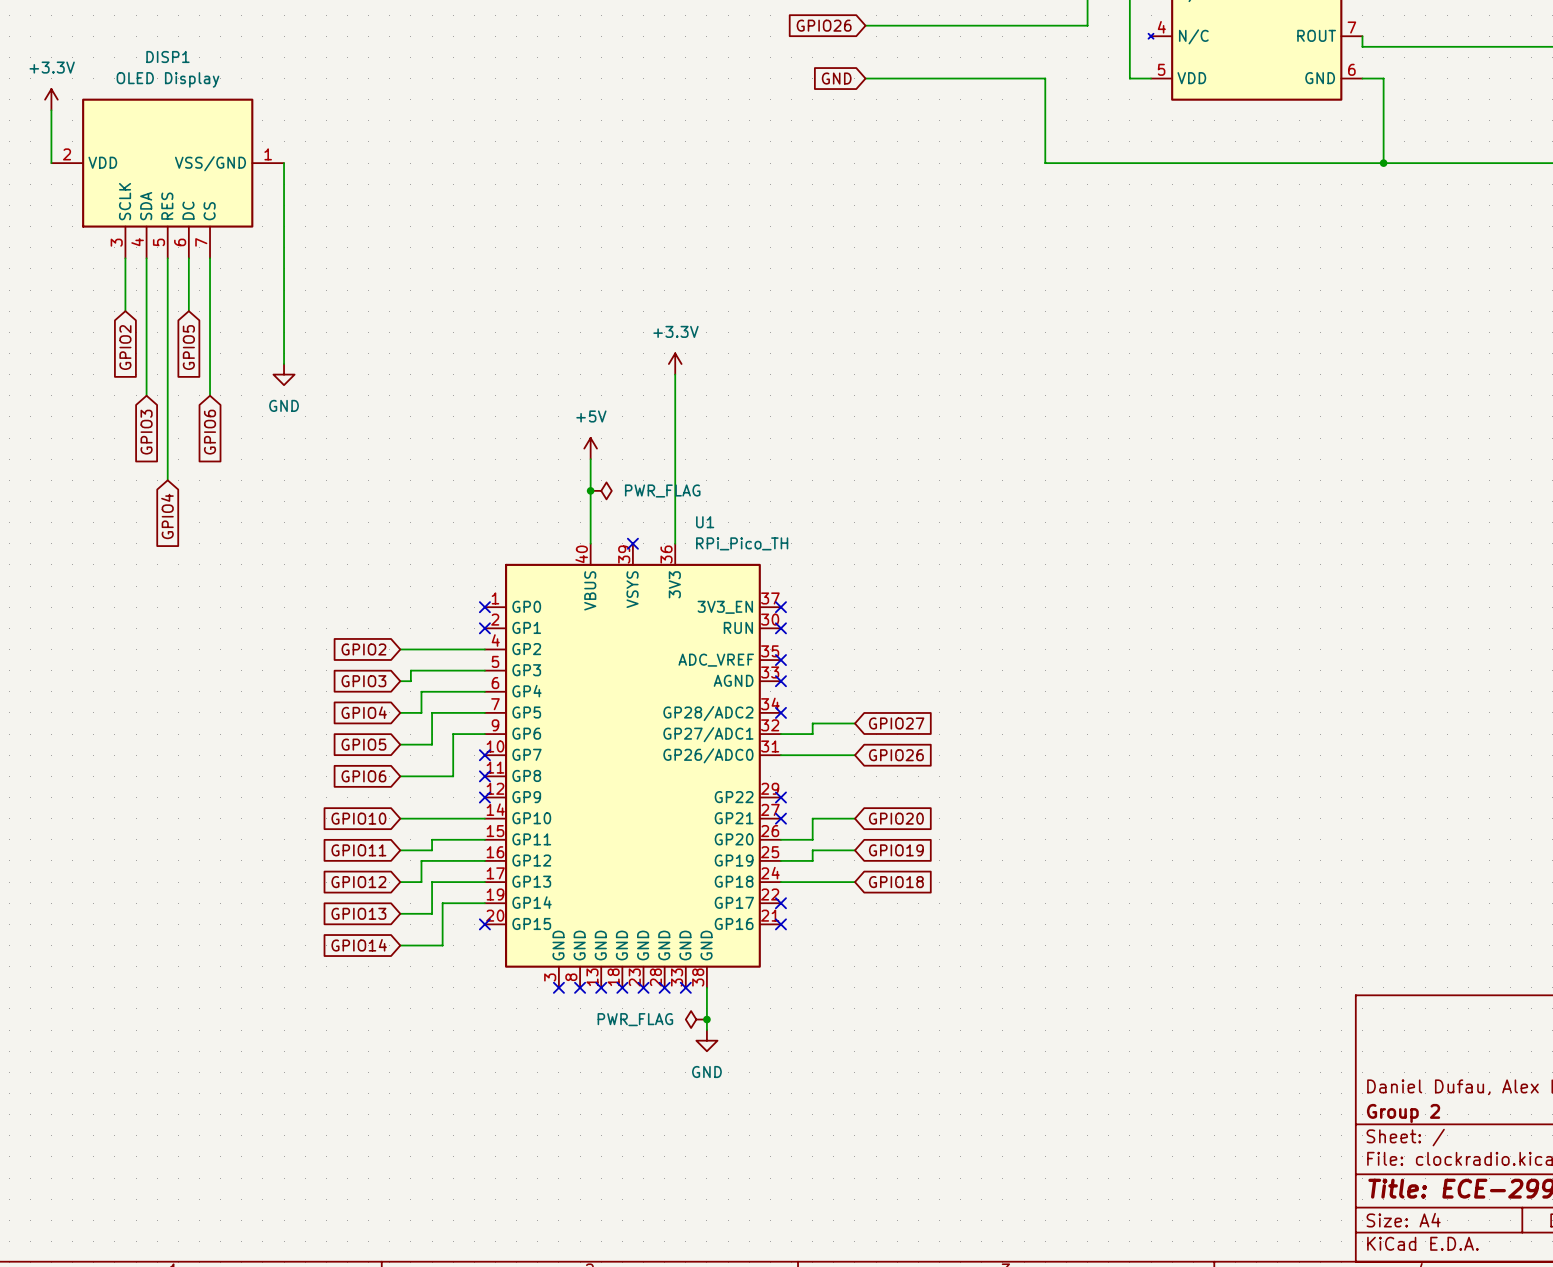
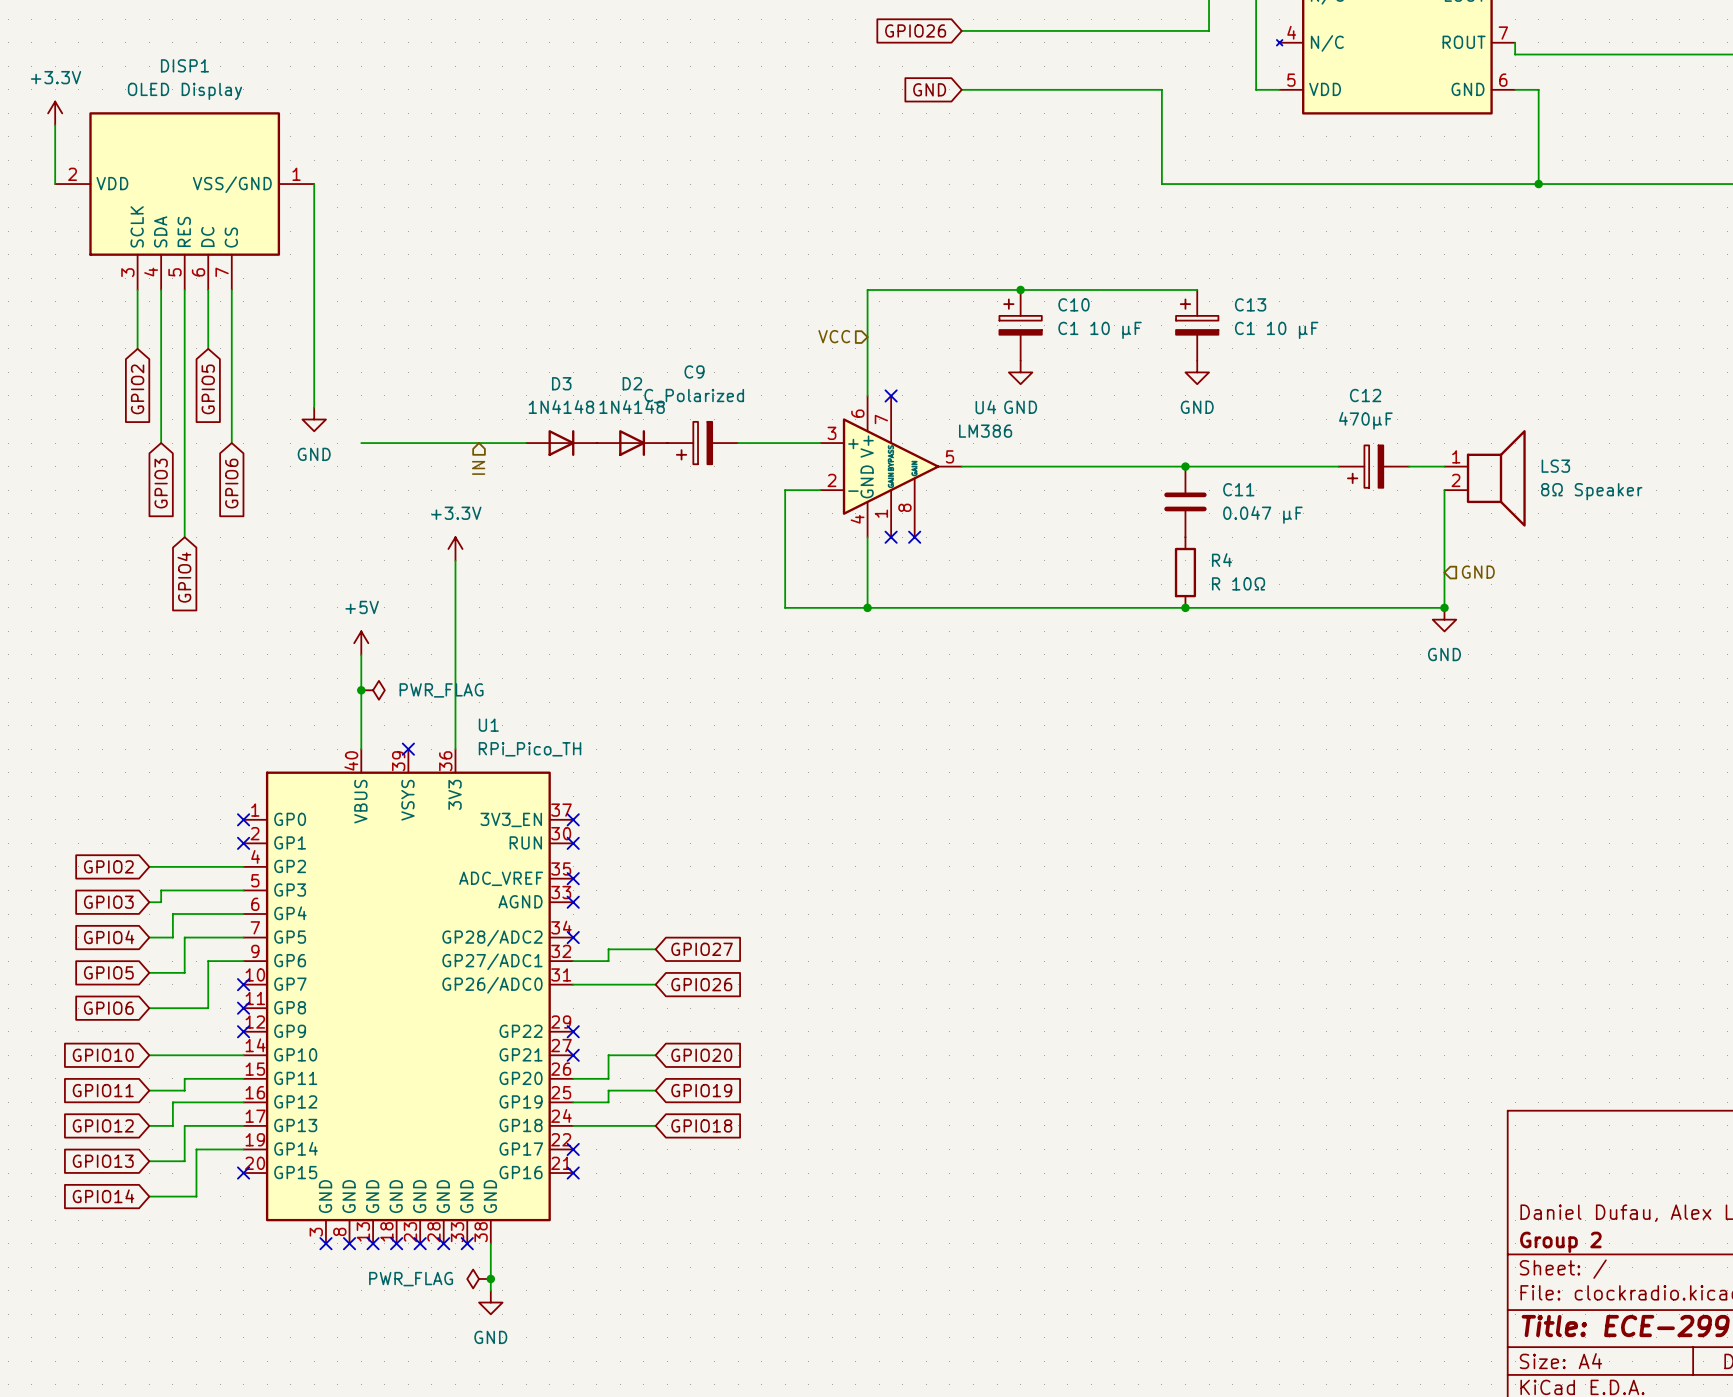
junction: none -> (1020, 289)
wire: none -> (1197, 289) (867, 289) (867, 395)
C10: none -> C1 10 µF (1020, 325)
C13: none -> C1 10 µF (1197, 325)
hierarchical label: none -> VCC (834, 336)
power symbol: none -> GND (1020, 372)
power symbol: none -> GND (1197, 372)
no-connect mark: none -> (891, 395)
power symbol: +3.3V (675, 364) -> none
wire: (675, 374) (675, 543) -> none
wire: none -> (361, 443) (526, 443)
D3: none -> 1N4148 (561, 443)
D2: none -> 1N4148 (632, 443)
C9: none -> C_Polarized (702, 443)
wire: none -> (738, 443) (820, 443)
U4: none -> LM386 (891, 466)
wire: none -> (961, 466) (1338, 466)
junction: none -> (1185, 466)
C12: none -> 470µF (1373, 466)
wire: none -> (1409, 466) (1444, 466)
hierarchical label: none -> IN (478, 467)
LS3: none -> 8Ω Speaker (1485, 478)
wire: none -> (820, 490) (785, 490) (785, 607) (1444, 607) (1444, 490)
power symbol: +5V (590, 448) -> none
C11: none -> 0.047 µF (1185, 501)
wire: (590, 459) (590, 543) -> none
wire: none -> (867, 537) (867, 607)
no-connect mark: none -> (891, 537)
no-connect mark: none -> (914, 537)
power symbol: none -> +3.3V (455, 549)
junction: (590, 490) -> none
power symbol: PWR_FLAG (601, 490) -> none
wire: none -> (455, 560) (455, 749)
hierarchical label: none -> GND (1478, 572)
R4: none -> R 10Ω (1185, 572)
no-connect mark: (632, 543) -> none
junction: none -> (867, 607)
junction: none -> (1185, 607)
junction: none -> (1444, 607)
power symbol: none -> GND (1444, 619)
power symbol: none -> +5V (361, 643)
wire: none -> (361, 654) (361, 749)
no-connect mark: (484, 607) -> none
no-connect mark: (780, 607) -> none
junction: none -> (361, 690)
power symbol: none -> PWR_FLAG (373, 690)
no-connect mark: (484, 628) -> none
no-connect mark: (780, 628) -> none
global label: GPIO2 (363, 649) -> none
wire: (400, 649) (484, 649) -> none
no-connect mark: (780, 660) -> none
no-connect mark: none -> (408, 749)
wire: (484, 670) (410, 670) (410, 681) (400, 681) -> none
global label: GPIO3 (363, 681) -> none
no-connect mark: (780, 681) -> none
global label: GPIO4 (364, 712) -> none
no-connect mark: (780, 712) -> none
wire: (854, 723) (812, 723) (812, 734) (780, 734) -> none
global label: GPIO27 (896, 723) -> none
no-connect mark: none -> (243, 819)
no-connect mark: none -> (573, 819)
global label: GPIO5 (363, 744) -> none
no-connect mark: none -> (243, 843)
no-connect mark: (484, 755) -> none
no-connect mark: none -> (573, 843)
wire: (780, 755) (854, 755) -> none
global label: GPIO26 (896, 755) -> none
U1 position: (632, 765) -> (408, 996)
global label: none -> GPIO2 (108, 866)
wire: none -> (149, 866) (243, 866)
global label: GPIO6 (363, 776) -> none
no-connect mark: (484, 776) -> none
no-connect mark: none -> (573, 878)
wire: none -> (243, 890) (161, 890) (161, 902) (149, 902)
no-connect mark: (484, 797) -> none
no-connect mark: (780, 797) -> none
global label: none -> GPIO3 (108, 902)
no-connect mark: none -> (573, 902)
wire: none -> (243, 914) (172, 914) (172, 937) (149, 937)
global label: GPIO10 (358, 818) -> none
no-connect mark: (780, 818) -> none
wire: (854, 818) (812, 818) (812, 839) (780, 839) -> none
global label: GPIO20 (896, 818) -> none
global label: none -> GPIO4 (109, 937)
wire: none -> (243, 937) (184, 937) (184, 972) (149, 972)
no-connect mark: none -> (573, 937)
global label: GPIO11 (358, 850) -> none
global label: none -> GPIO27 (702, 949)
wire: (854, 850) (812, 850) (812, 860) (780, 860) -> none
global label: GPIO19 (896, 850) -> none
wire: none -> (243, 961) (208, 961) (208, 1008) (149, 1008)
global label: none -> GPIO5 (108, 972)
no-connect mark: none -> (243, 984)
global label: GPIO12 (358, 882) -> none
global label: none -> GPIO26 (701, 984)
wire: (780, 882) (854, 882) -> none
global label: GPIO18 (896, 882) -> none
global label: none -> GPIO6 (108, 1008)
no-connect mark: none -> (243, 1008)
no-connect mark: (780, 903) -> none
global label: GPIO13 (358, 913) -> none
no-connect mark: none -> (243, 1031)
no-connect mark: (484, 924) -> none
no-connect mark: none -> (573, 1031)
no-connect mark: (780, 924) -> none
global label: none -> GPIO10 (103, 1055)
wire: none -> (149, 1055) (243, 1055)
global label: GPIO14 (359, 945) -> none
no-connect mark: none -> (573, 1055)
global label: none -> GPIO20 (701, 1055)
wire: none -> (243, 1078) (184, 1078) (184, 1090) (149, 1090)
global label: none -> GPIO11 (103, 1090)
wire: none -> (655, 1090) (608, 1090) (608, 1102) (573, 1102)
global label: none -> GPIO19 (701, 1090)
wire: none -> (243, 1102) (172, 1102) (172, 1125) (149, 1125)
no-connect mark: (558, 987) -> none
no-connect mark: (580, 987) -> none
no-connect mark: (601, 987) -> none
no-connect mark: (622, 987) -> none
no-connect mark: (643, 987) -> none
no-connect mark: (664, 987) -> none
no-connect mark: (685, 987) -> none
wire: (706, 987) (706, 1030) -> none
global label: none -> GPIO12 (103, 1125)
wire: none -> (243, 1125) (184, 1125) (184, 1161) (149, 1161)
wire: none -> (573, 1125) (655, 1125)
global label: none -> GPIO18 (701, 1125)
power symbol: PWR_FLAG (696, 1019) -> none
junction: (706, 1019) -> none
wire: none -> (243, 1149) (196, 1149) (196, 1196) (149, 1196)
no-connect mark: none -> (573, 1149)
global label: none -> GPIO13 (103, 1161)
power symbol: GND (706, 1040) -> none
no-connect mark: none -> (243, 1173)
no-connect mark: none -> (573, 1173)
global label: none -> GPIO14 (103, 1196)
no-connect mark: none -> (325, 1243)
no-connect mark: none -> (349, 1243)
no-connect mark: none -> (373, 1243)
no-connect mark: none -> (396, 1243)
no-connect mark: none -> (420, 1243)
no-connect mark: none -> (443, 1243)
no-connect mark: none -> (467, 1243)
wire: none -> (490, 1243) (490, 1290)
power symbol: none -> PWR_FLAG (479, 1278)
junction: none -> (490, 1278)
power symbol: none -> GND (490, 1302)

